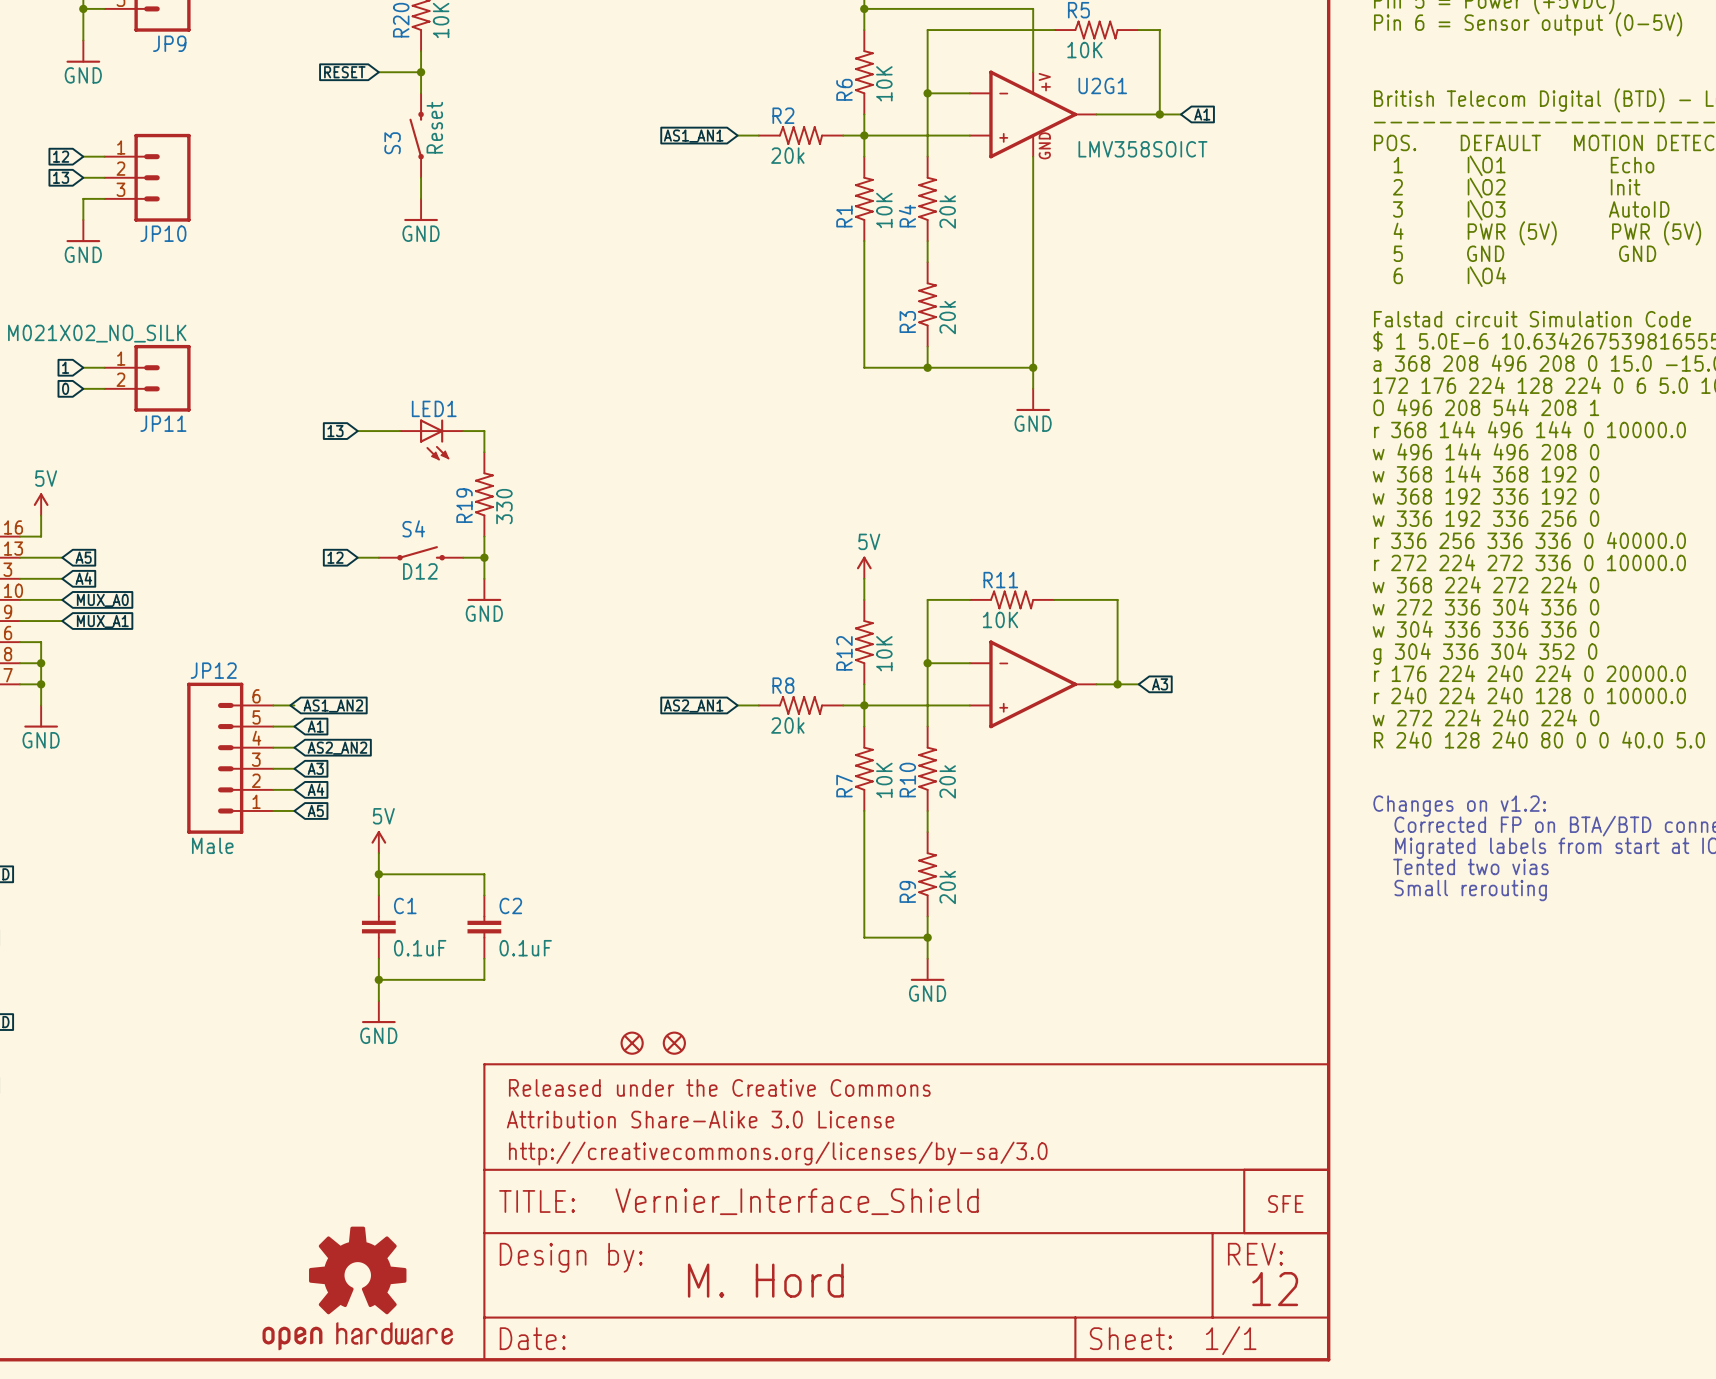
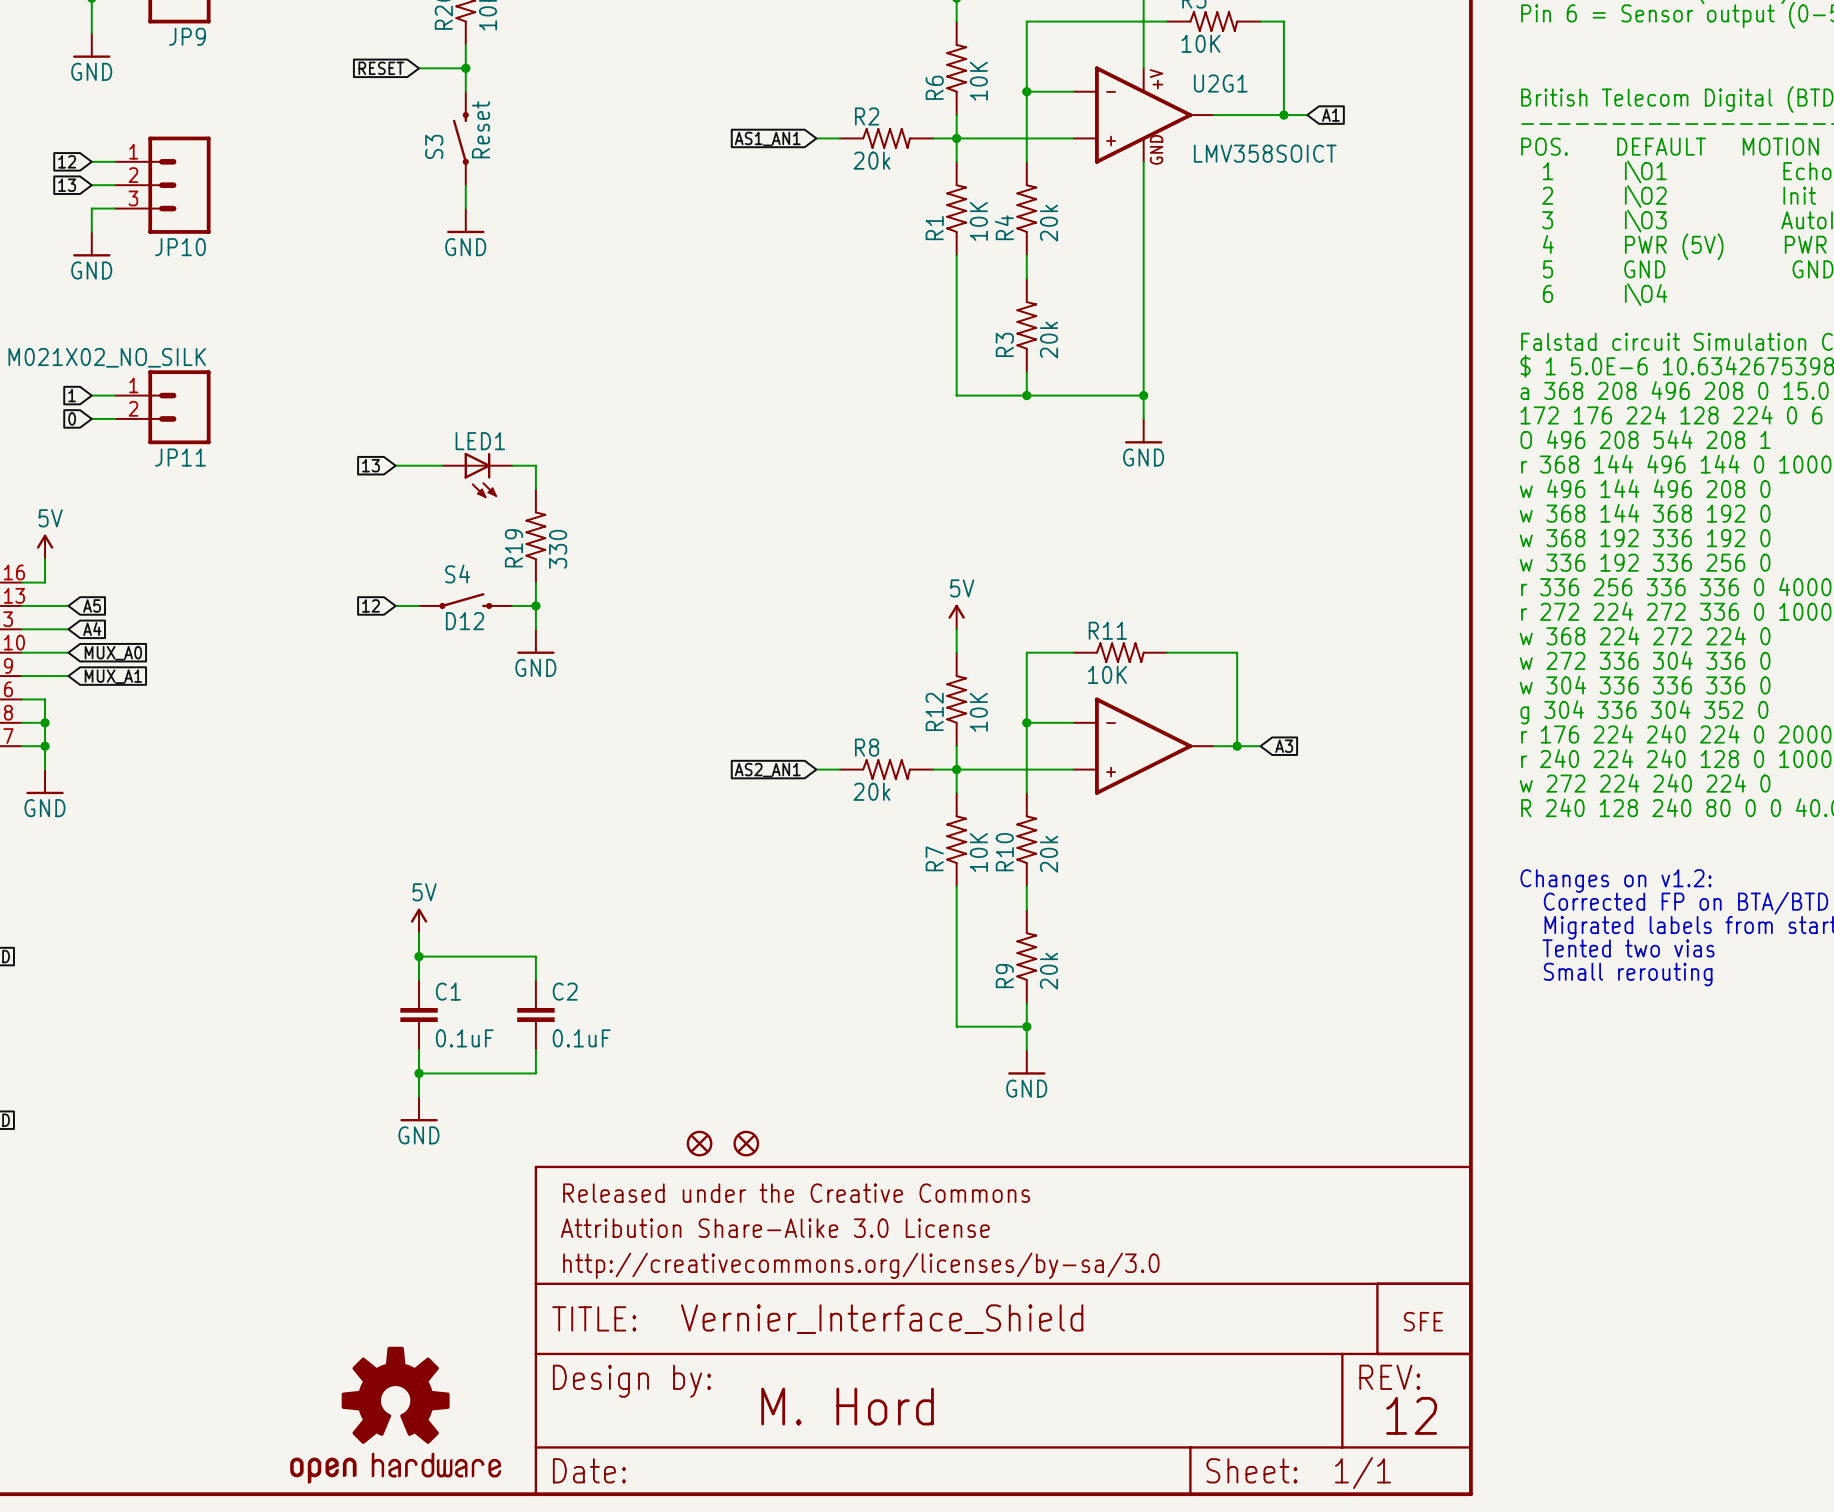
wire: (273, 705) (294, 705) -> none
global label: AS1_AN2 (333, 705) -> none
wire: (273, 726) (294, 726) -> none
global label: A1 (315, 726) -> none
wire: (273, 747) (294, 747) -> none
global label: AS2_AN2 (337, 748) -> none
JP12: Male (230, 758) -> none
wire: (273, 768) (294, 768) -> none
global label: A3 (315, 768) -> none
wire: (273, 789) (294, 789) -> none
global label: A4 (316, 789) -> none
wire: (273, 810) (294, 810) -> none
global label: A5 (315, 810) -> none

